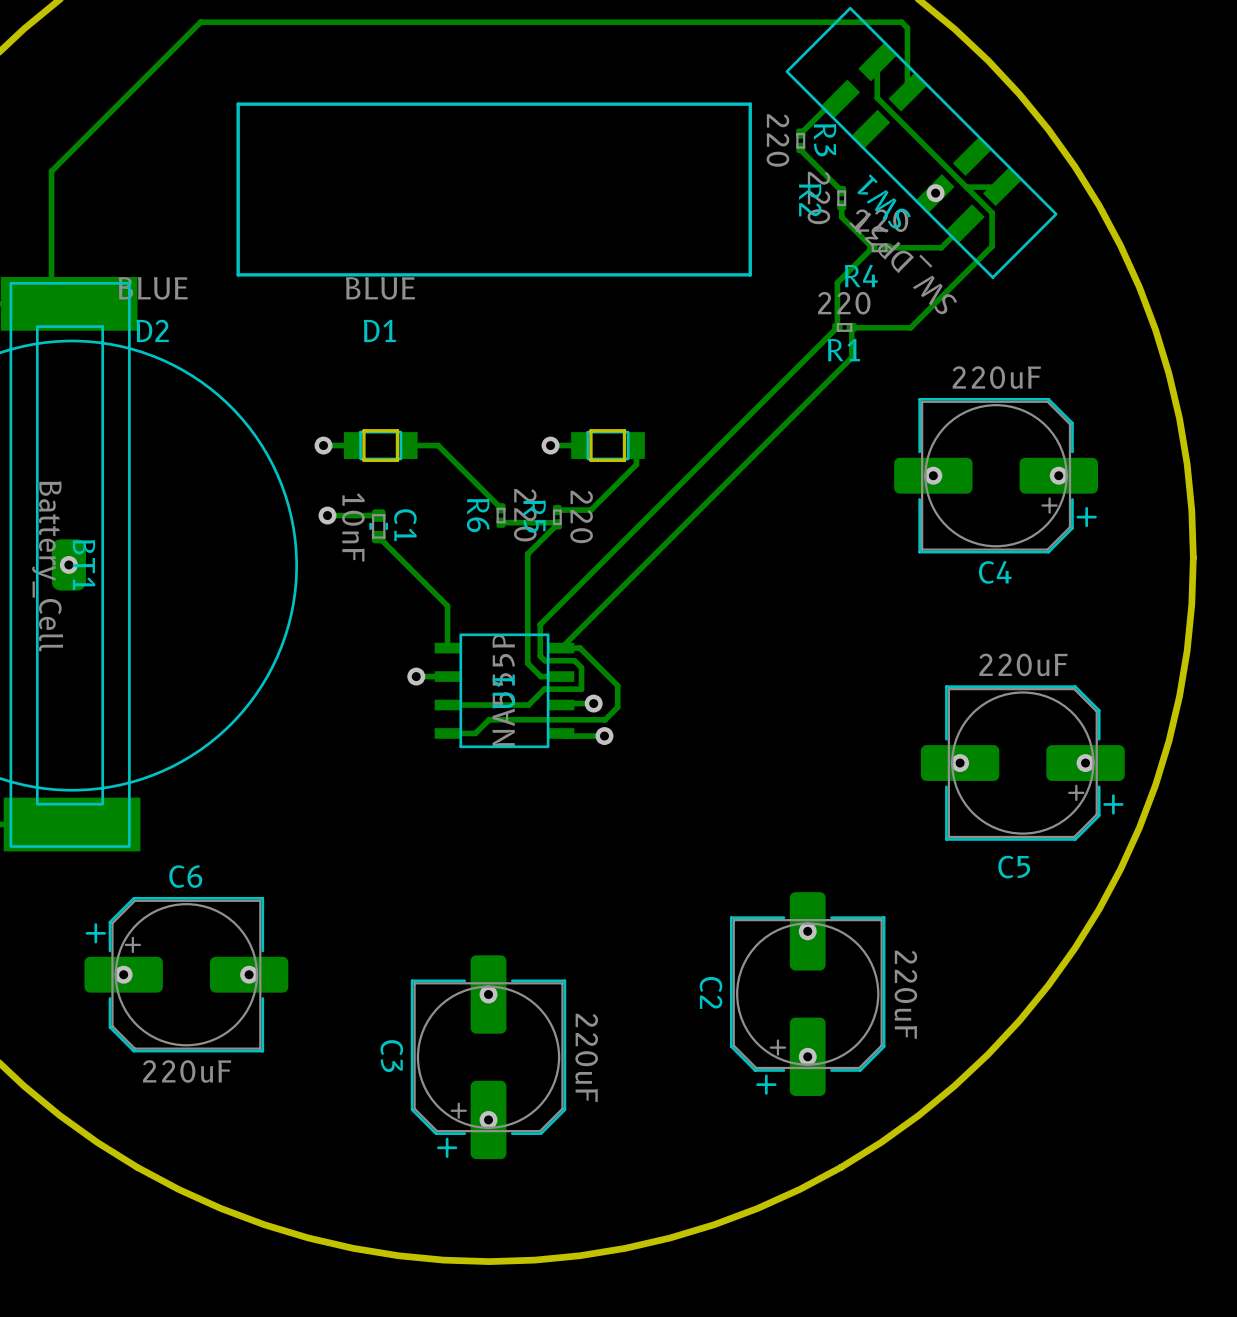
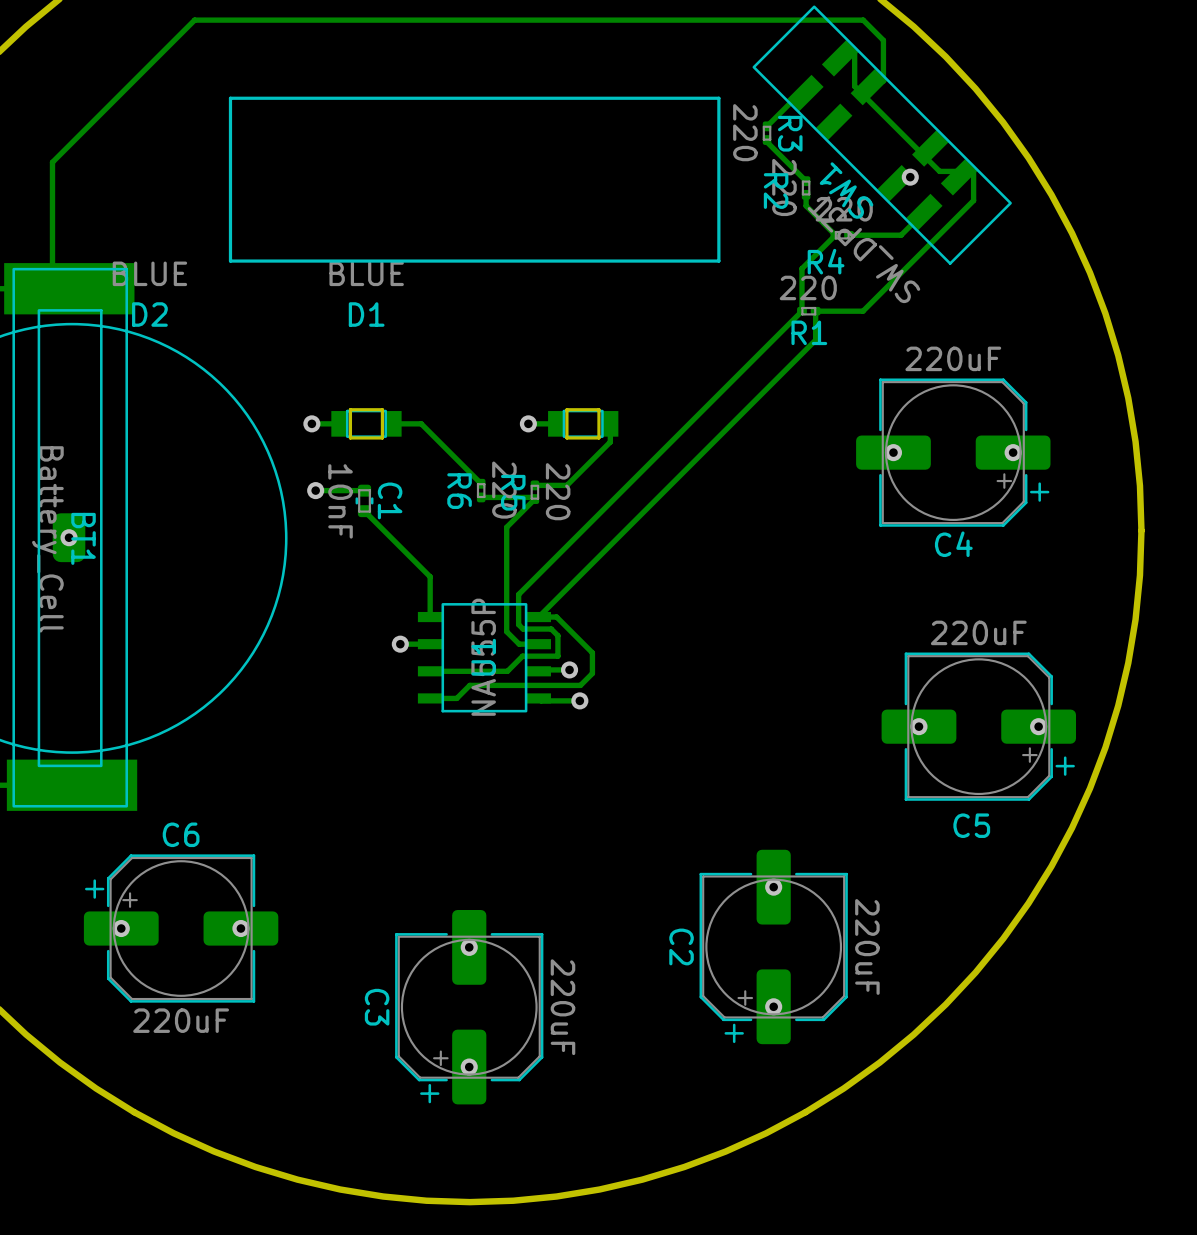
track: (907, 28) (907, 92) -> (868, 25) (883, 40) (883, 81)
track: (877, 62) (877, 98) (992, 212) (992, 246) (910, 327) (851, 327) -> (854, 52) (854, 86) (939, 171) (973, 171) (973, 200) (863, 311) (815, 311)
track: (1001, 187) (966, 187) -> none
via position: (935, 193) -> (910, 177)

